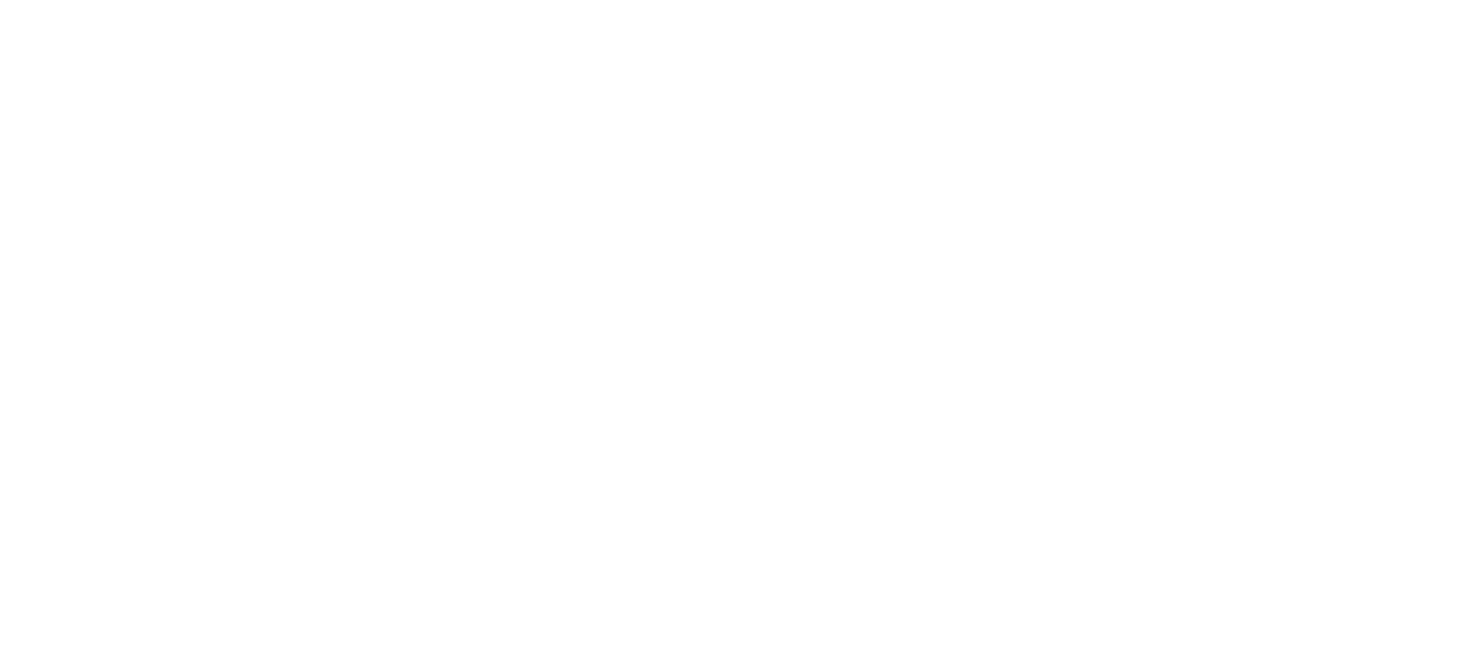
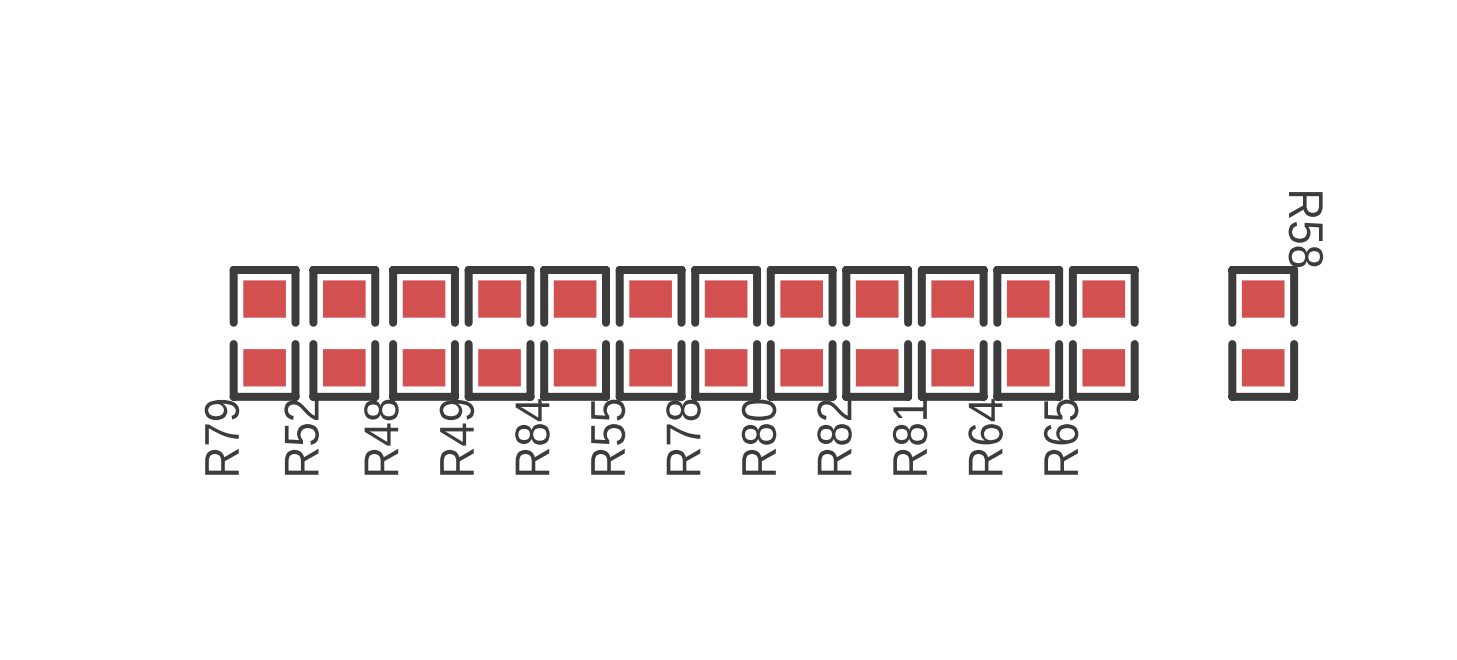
R79: none -> (264, 333)
R52: none -> (344, 333)
R48: none -> (424, 333)
R49: none -> (499, 333)
R84: none -> (575, 333)
R55: none -> (650, 333)
R78: none -> (726, 333)
R80: none -> (801, 333)
R82: none -> (877, 333)
R81: none -> (952, 333)
R64: none -> (1028, 333)
R65: none -> (1103, 333)
R58: none -> (1263, 333)

